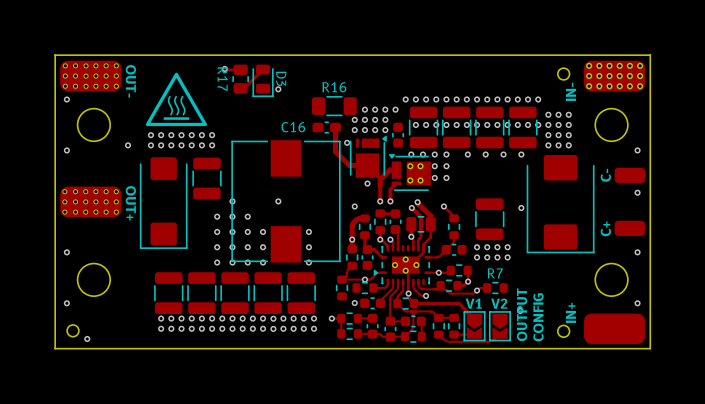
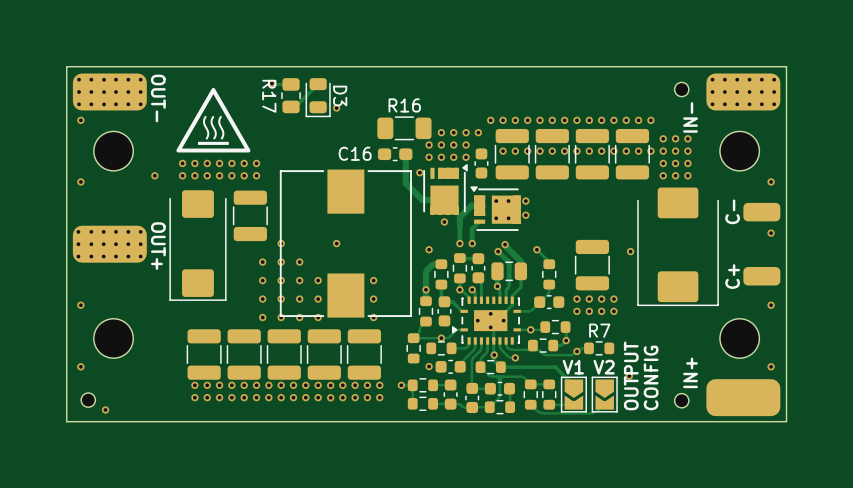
via: (411, 154) -> none
via: (423, 154) -> none
via: (434, 154) -> none
via: (446, 154) -> none
via: (467, 154) -> none
via: (485, 154) -> none
via: (503, 154) -> none
via: (521, 154) -> none
via: (446, 166) -> none
via: (446, 177) -> none

